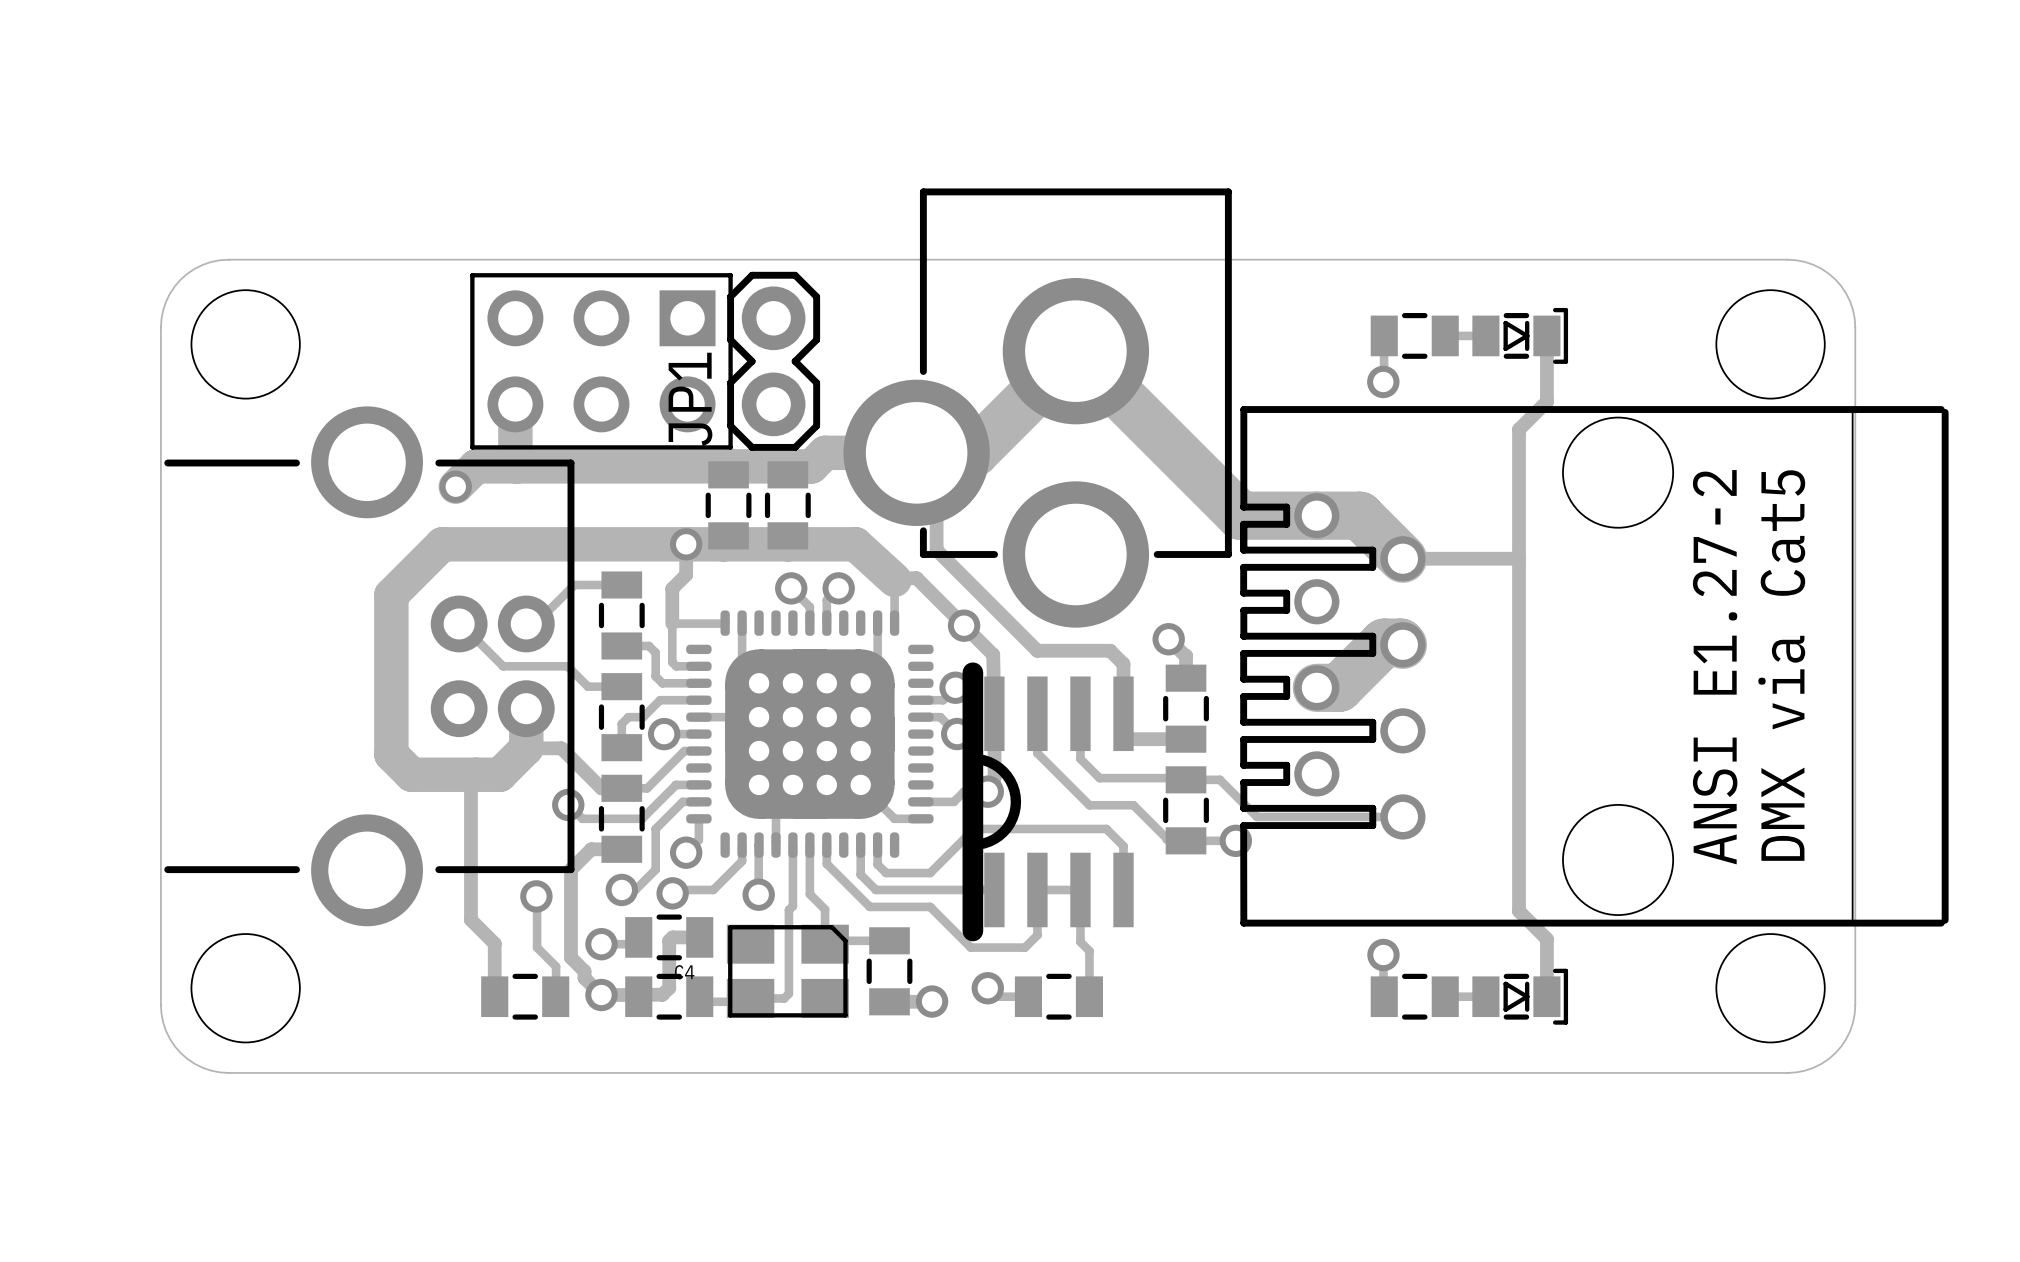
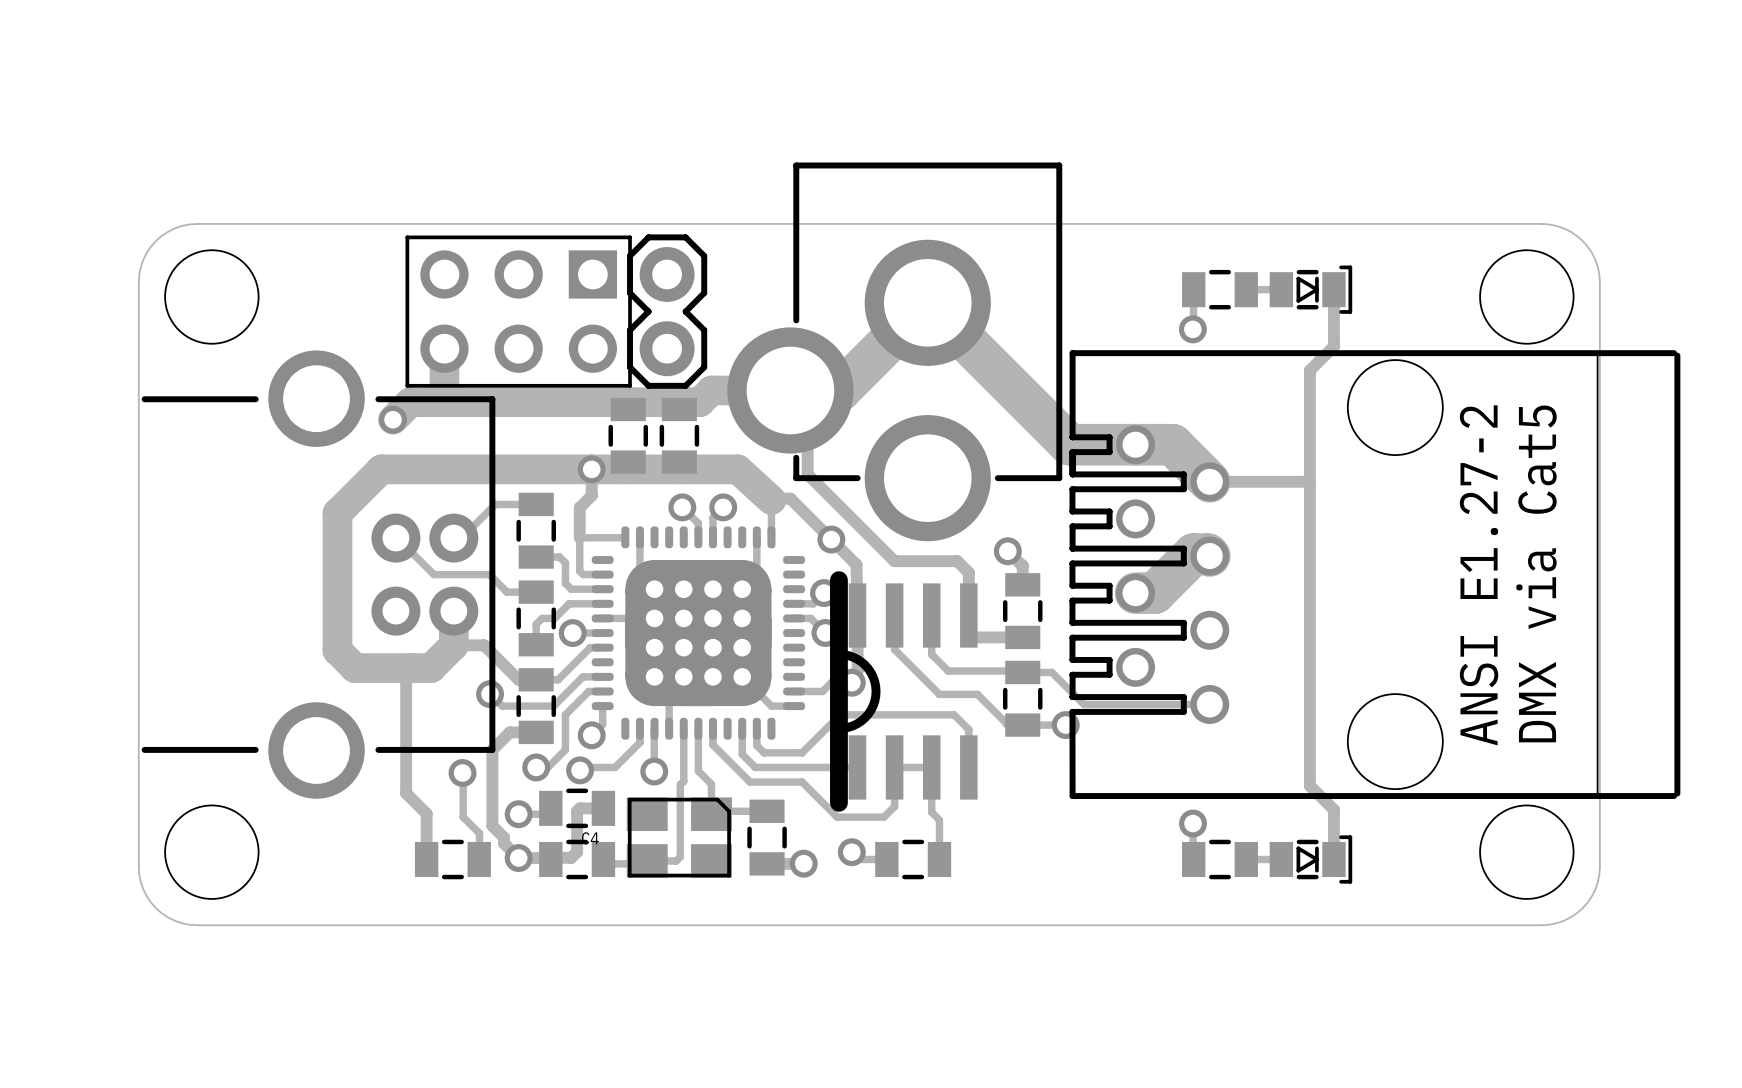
JP1 name: JP1 (690, 399) -> none

